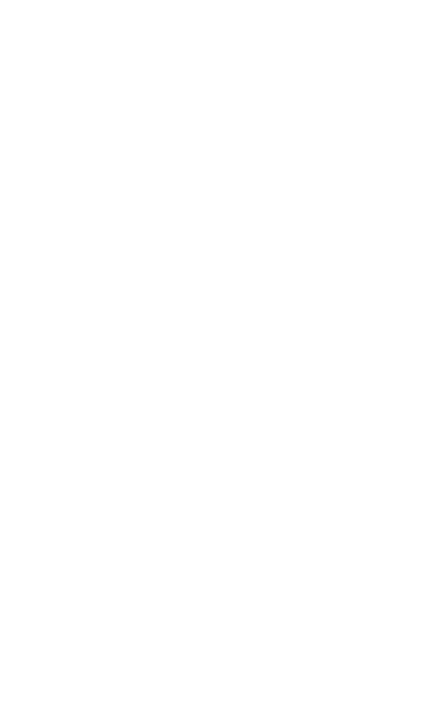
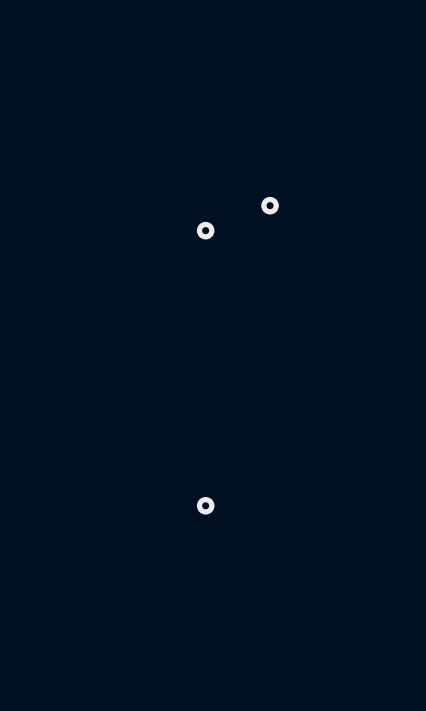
via: none -> (270, 205)
via: none -> (205, 230)
via: none -> (205, 505)

